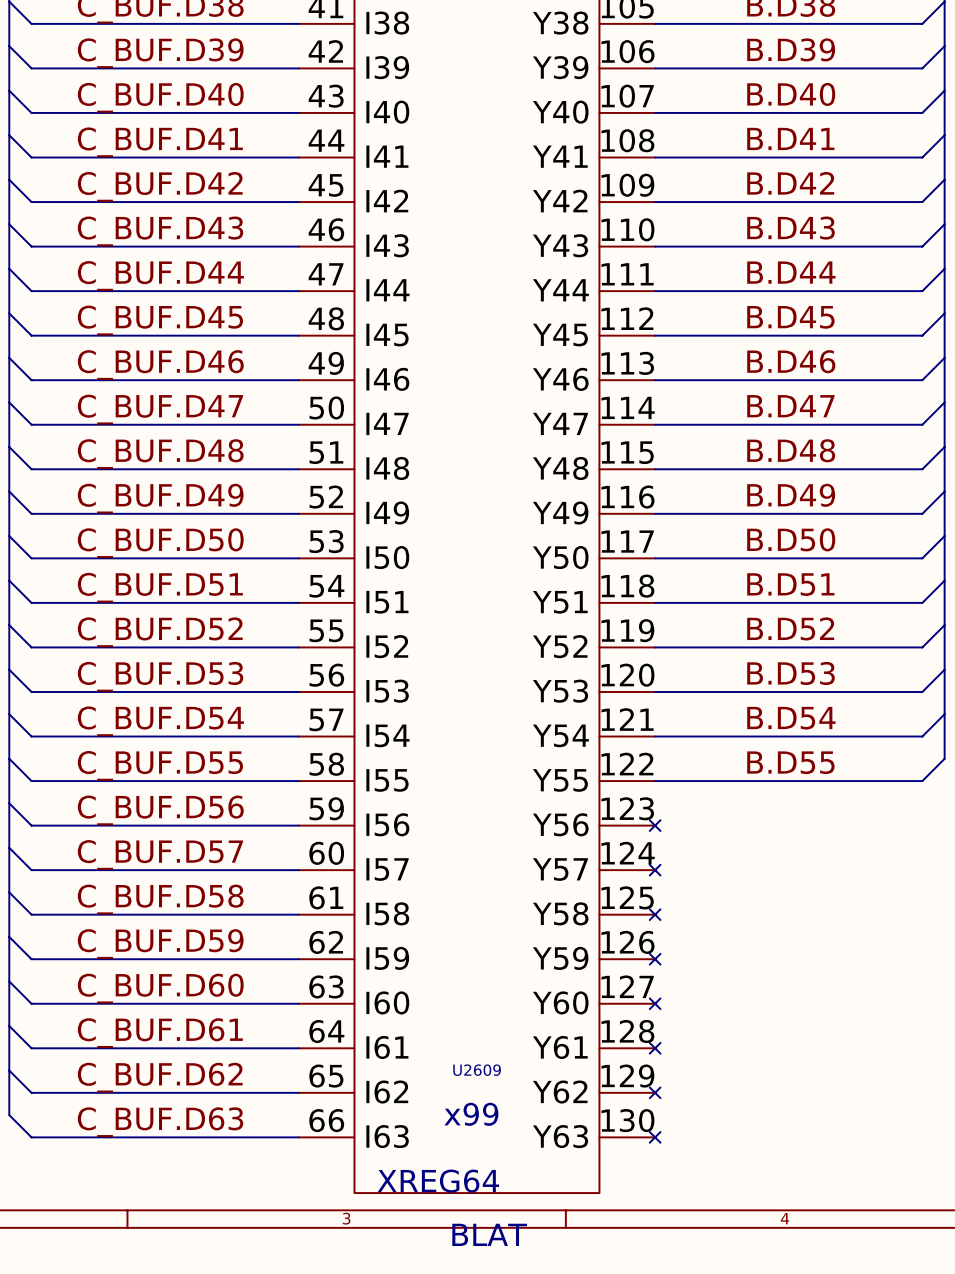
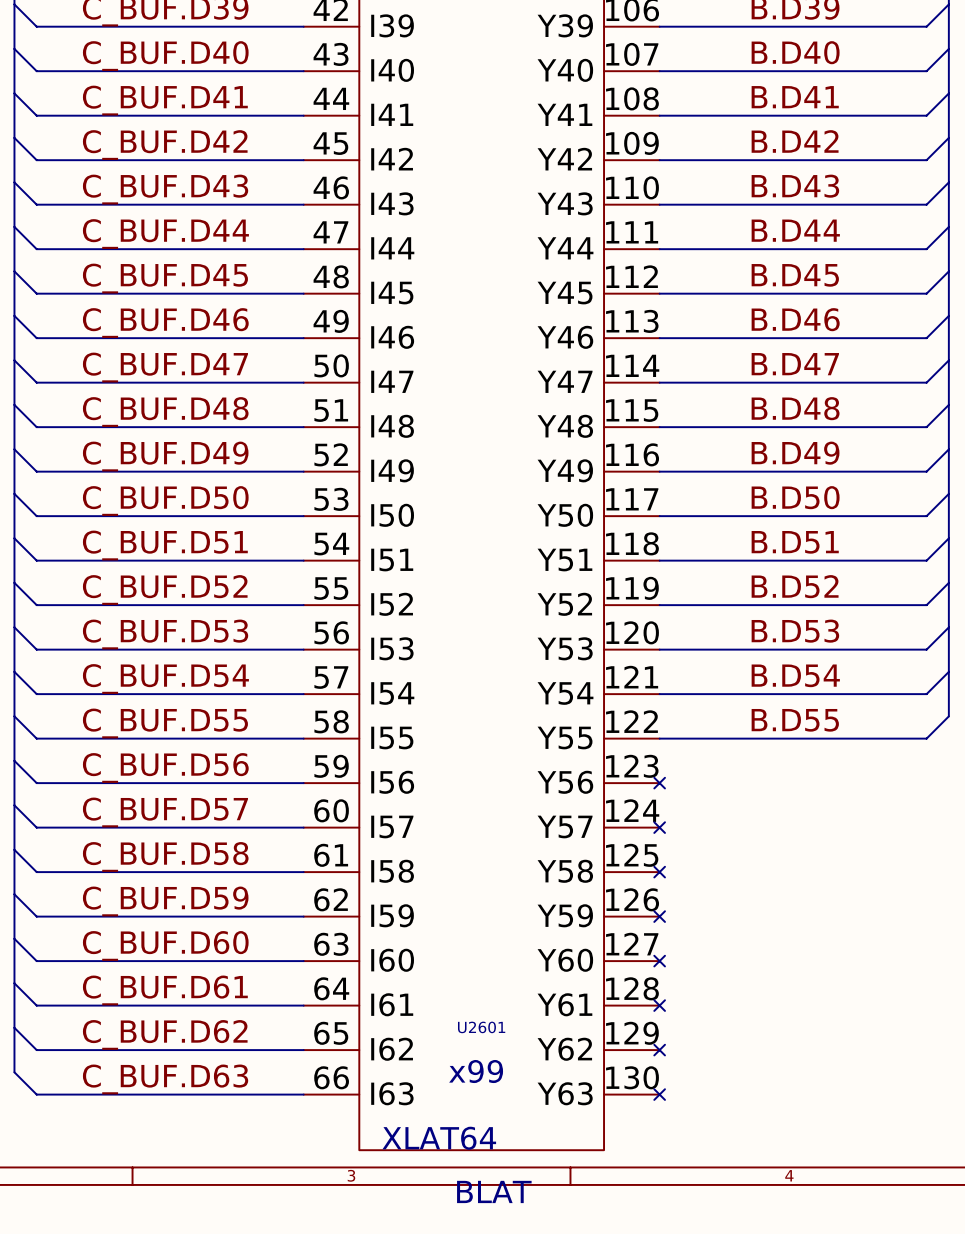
U2609 name: U2609 (477, 1070) -> U2601 (481, 1027)
U2609 value: XREG64 (438, 1181) -> XLAT64 (439, 1138)

